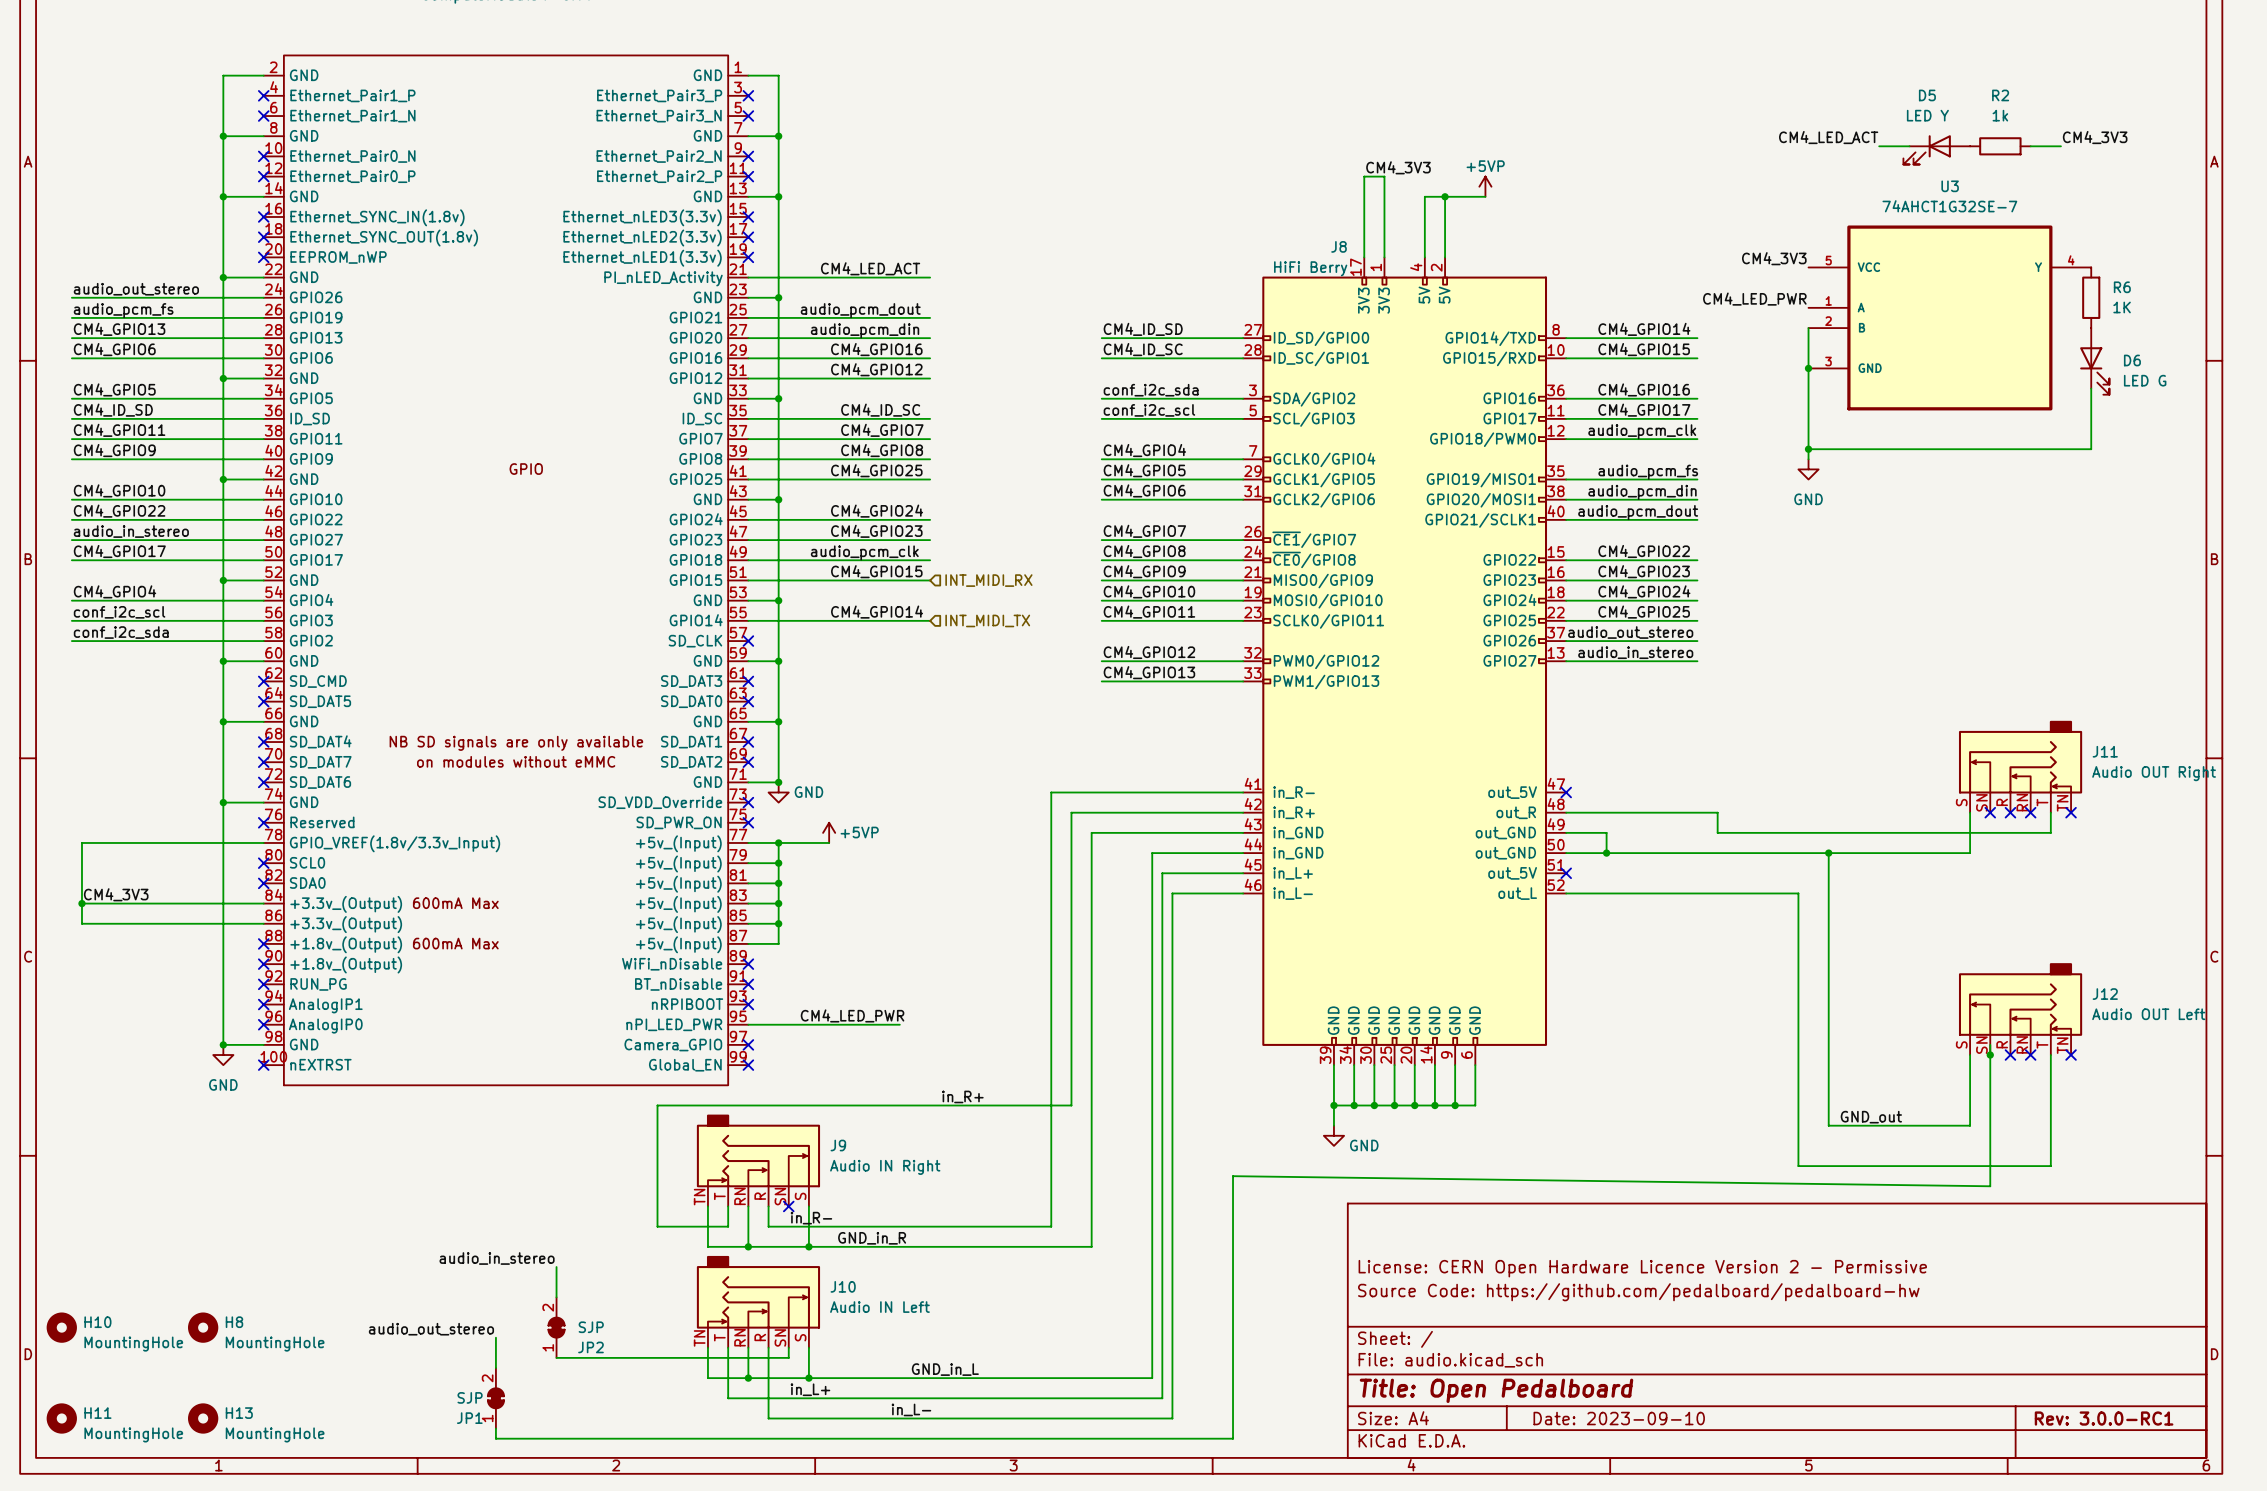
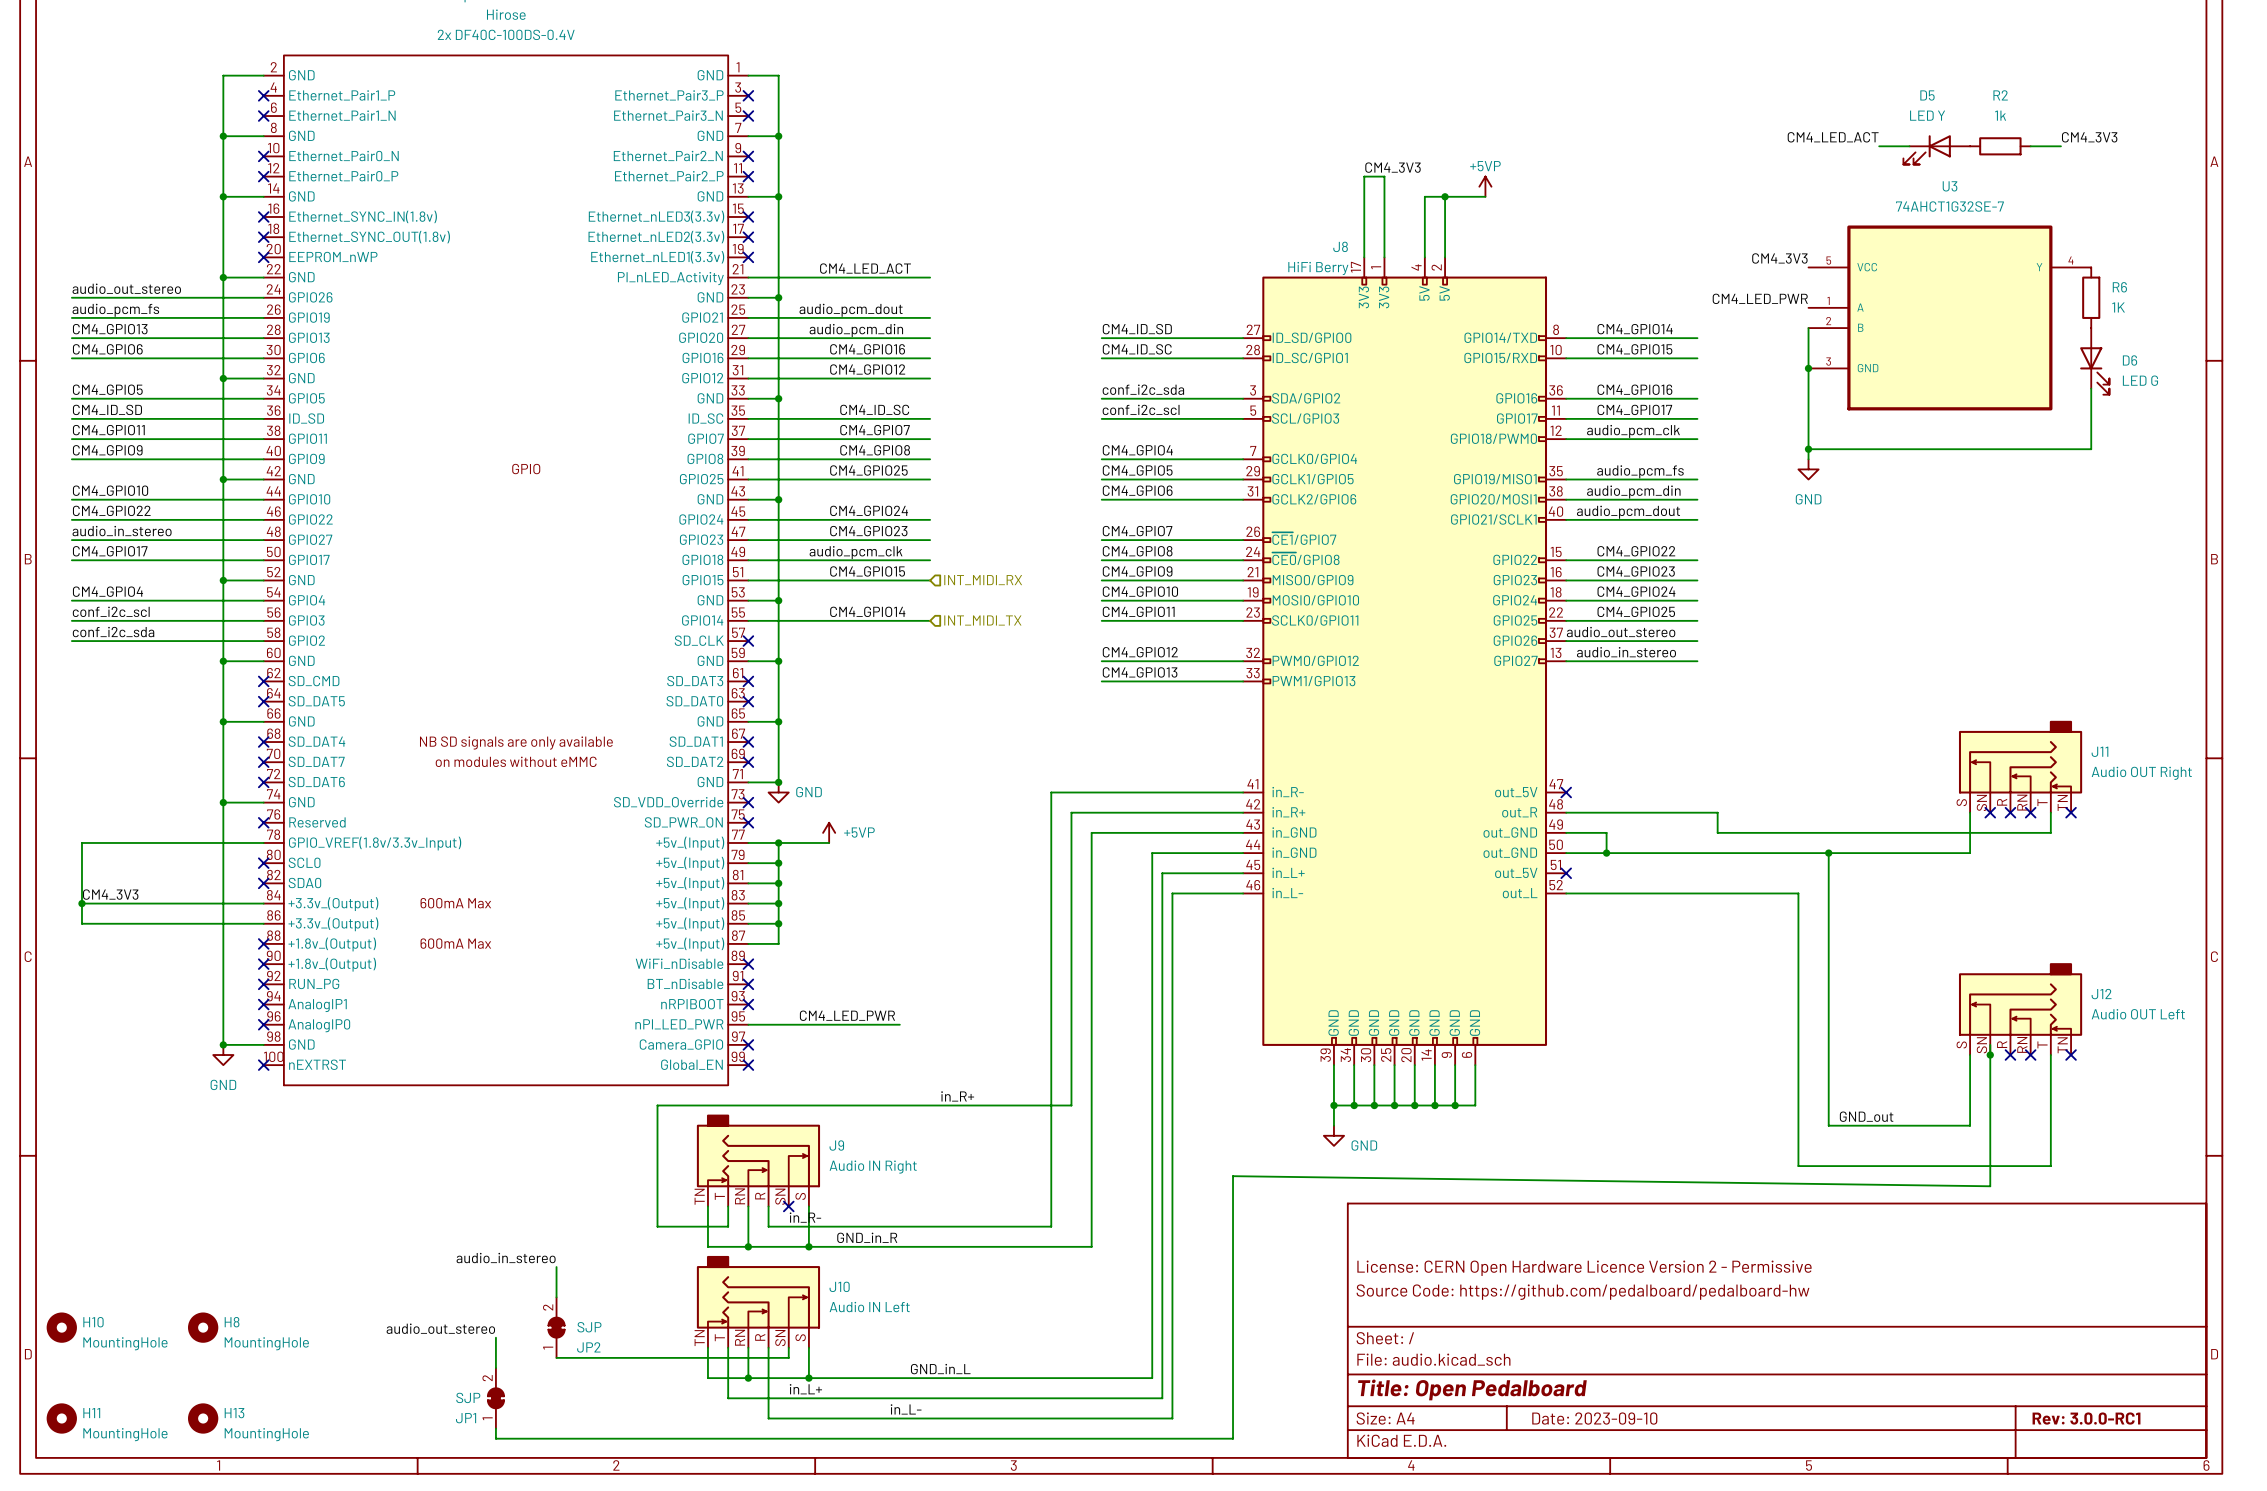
part text: none -> Hirose (506, 14)
part text: none -> 2x DF40C-100DS-0.4V (506, 34)

